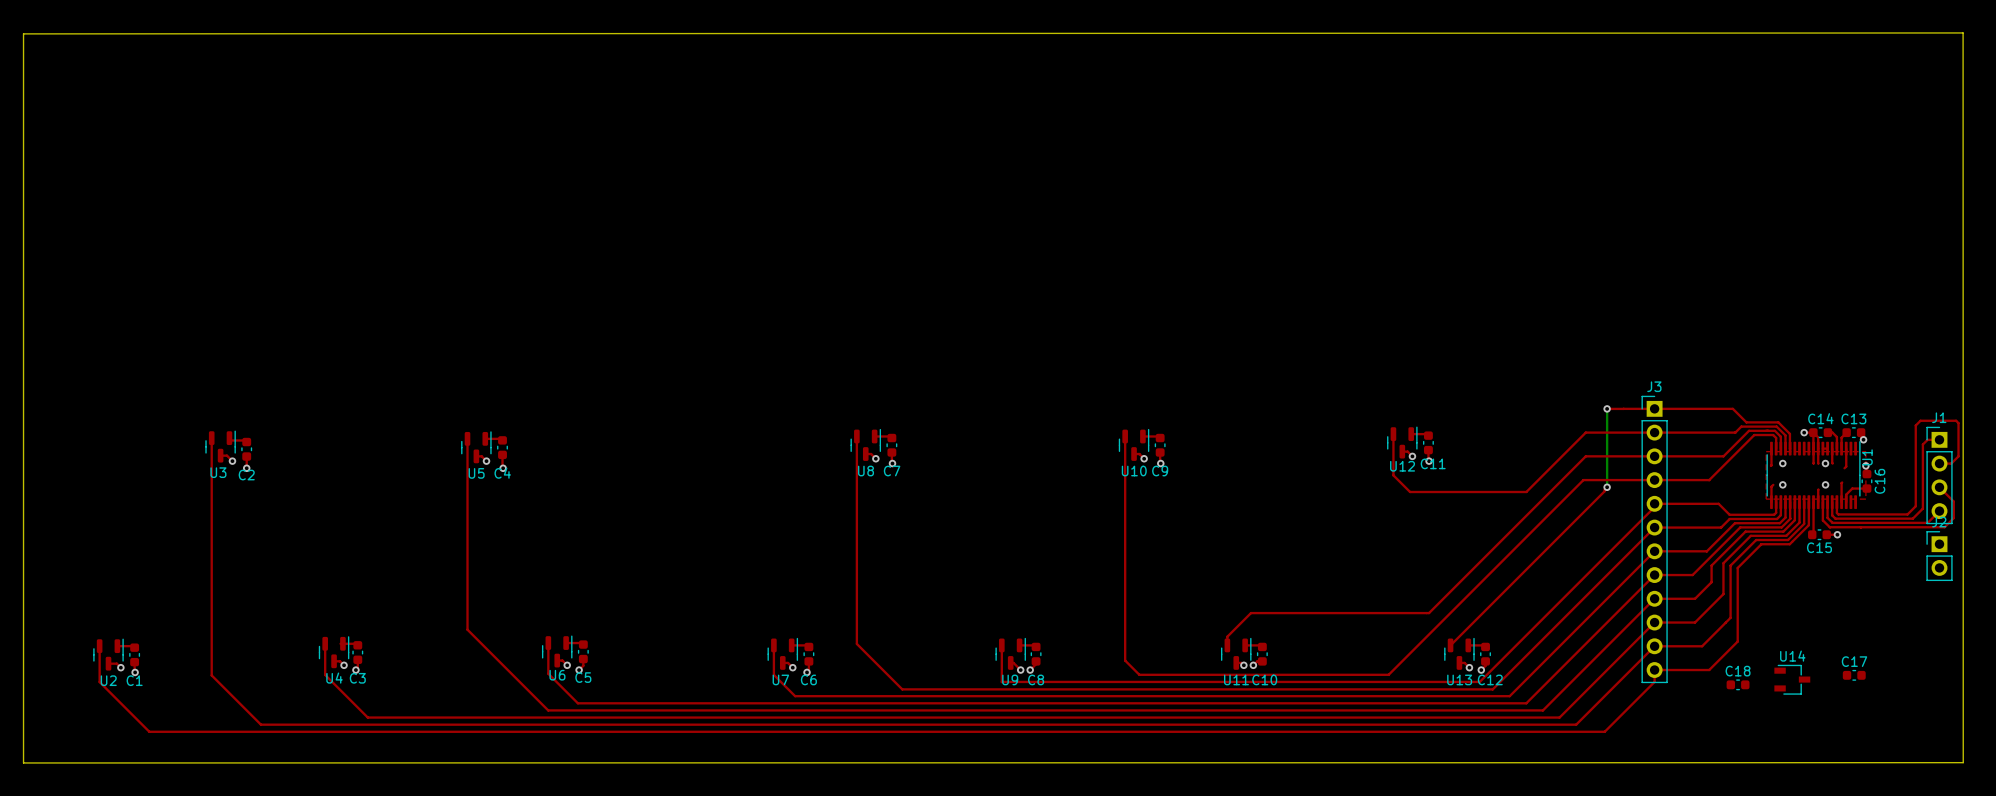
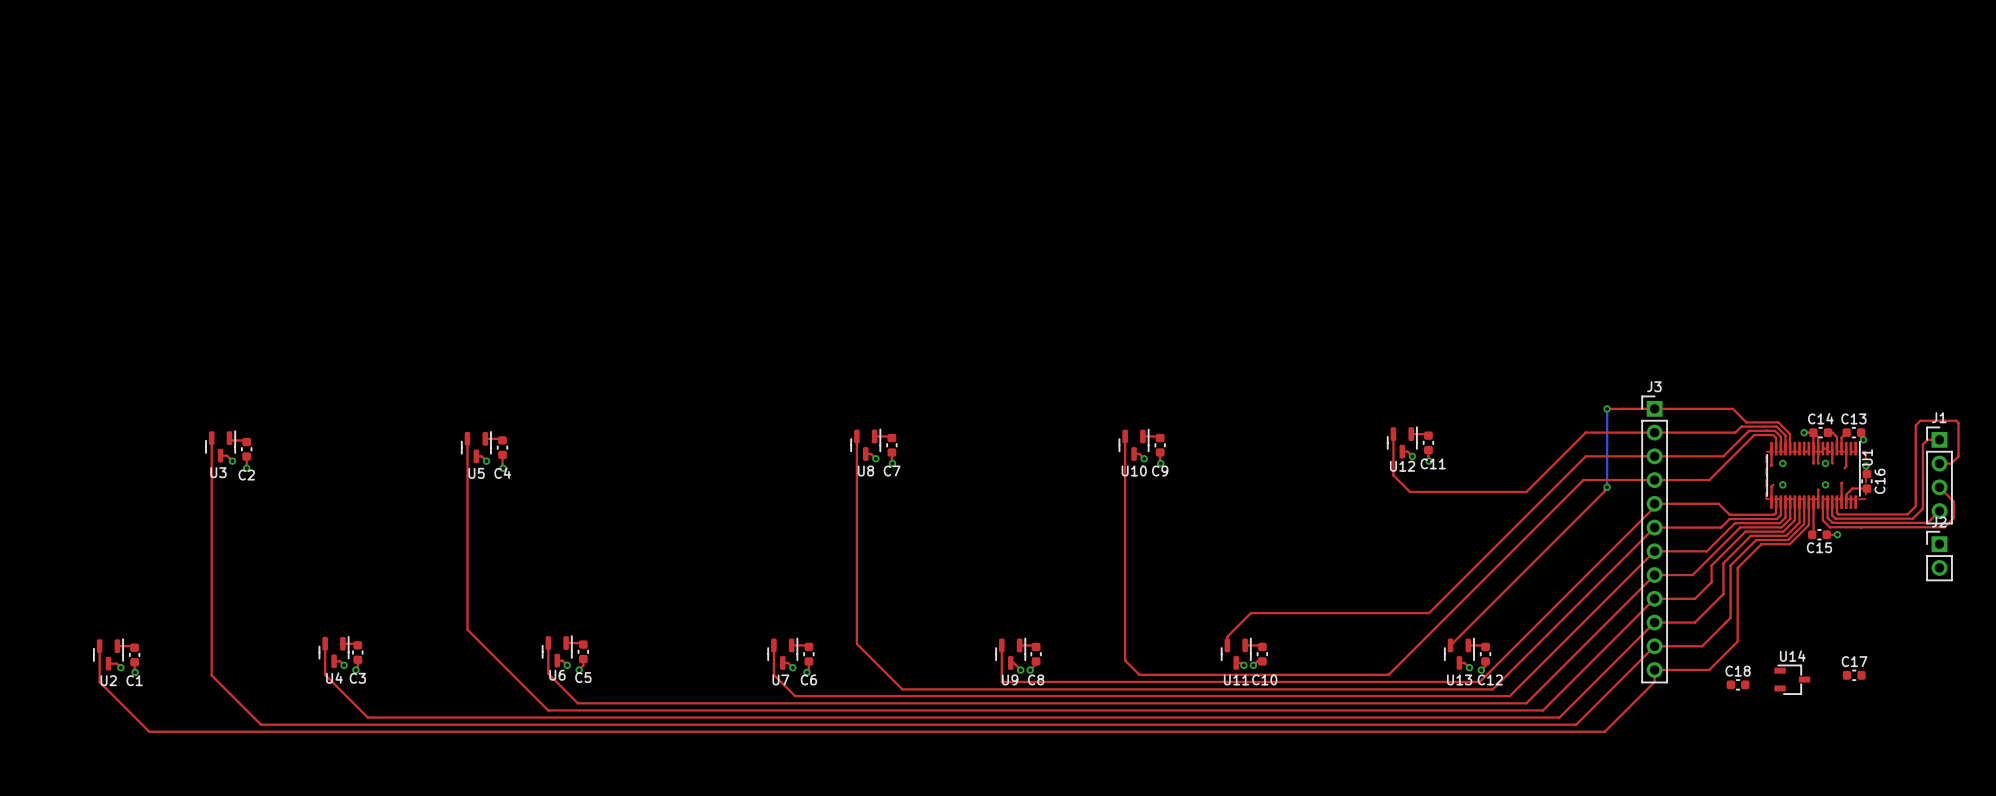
board edge: (1963, 32) (1963, 762) (23, 762) (23, 33) (1963, 32) -> none

